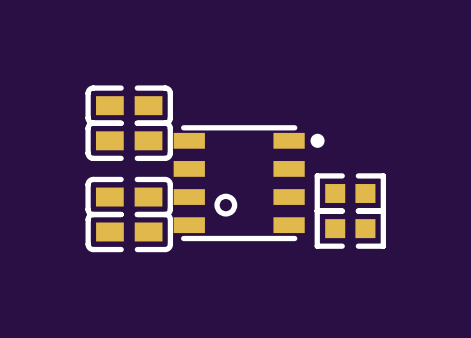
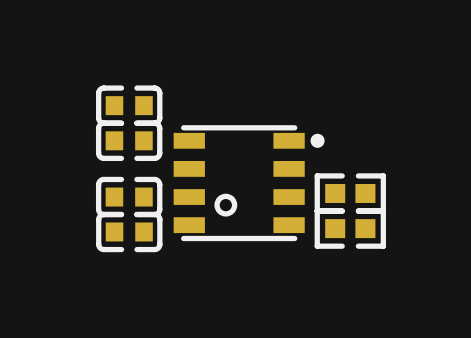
part footprint: [85, 85, 173, 126] -> [96, 85, 163, 126]
part footprint: [85, 120, 173, 162] -> [95, 120, 163, 162]
part footprint: [85, 176, 173, 218] -> [95, 176, 163, 218]
part footprint: [85, 211, 174, 253] -> [96, 211, 163, 253]

